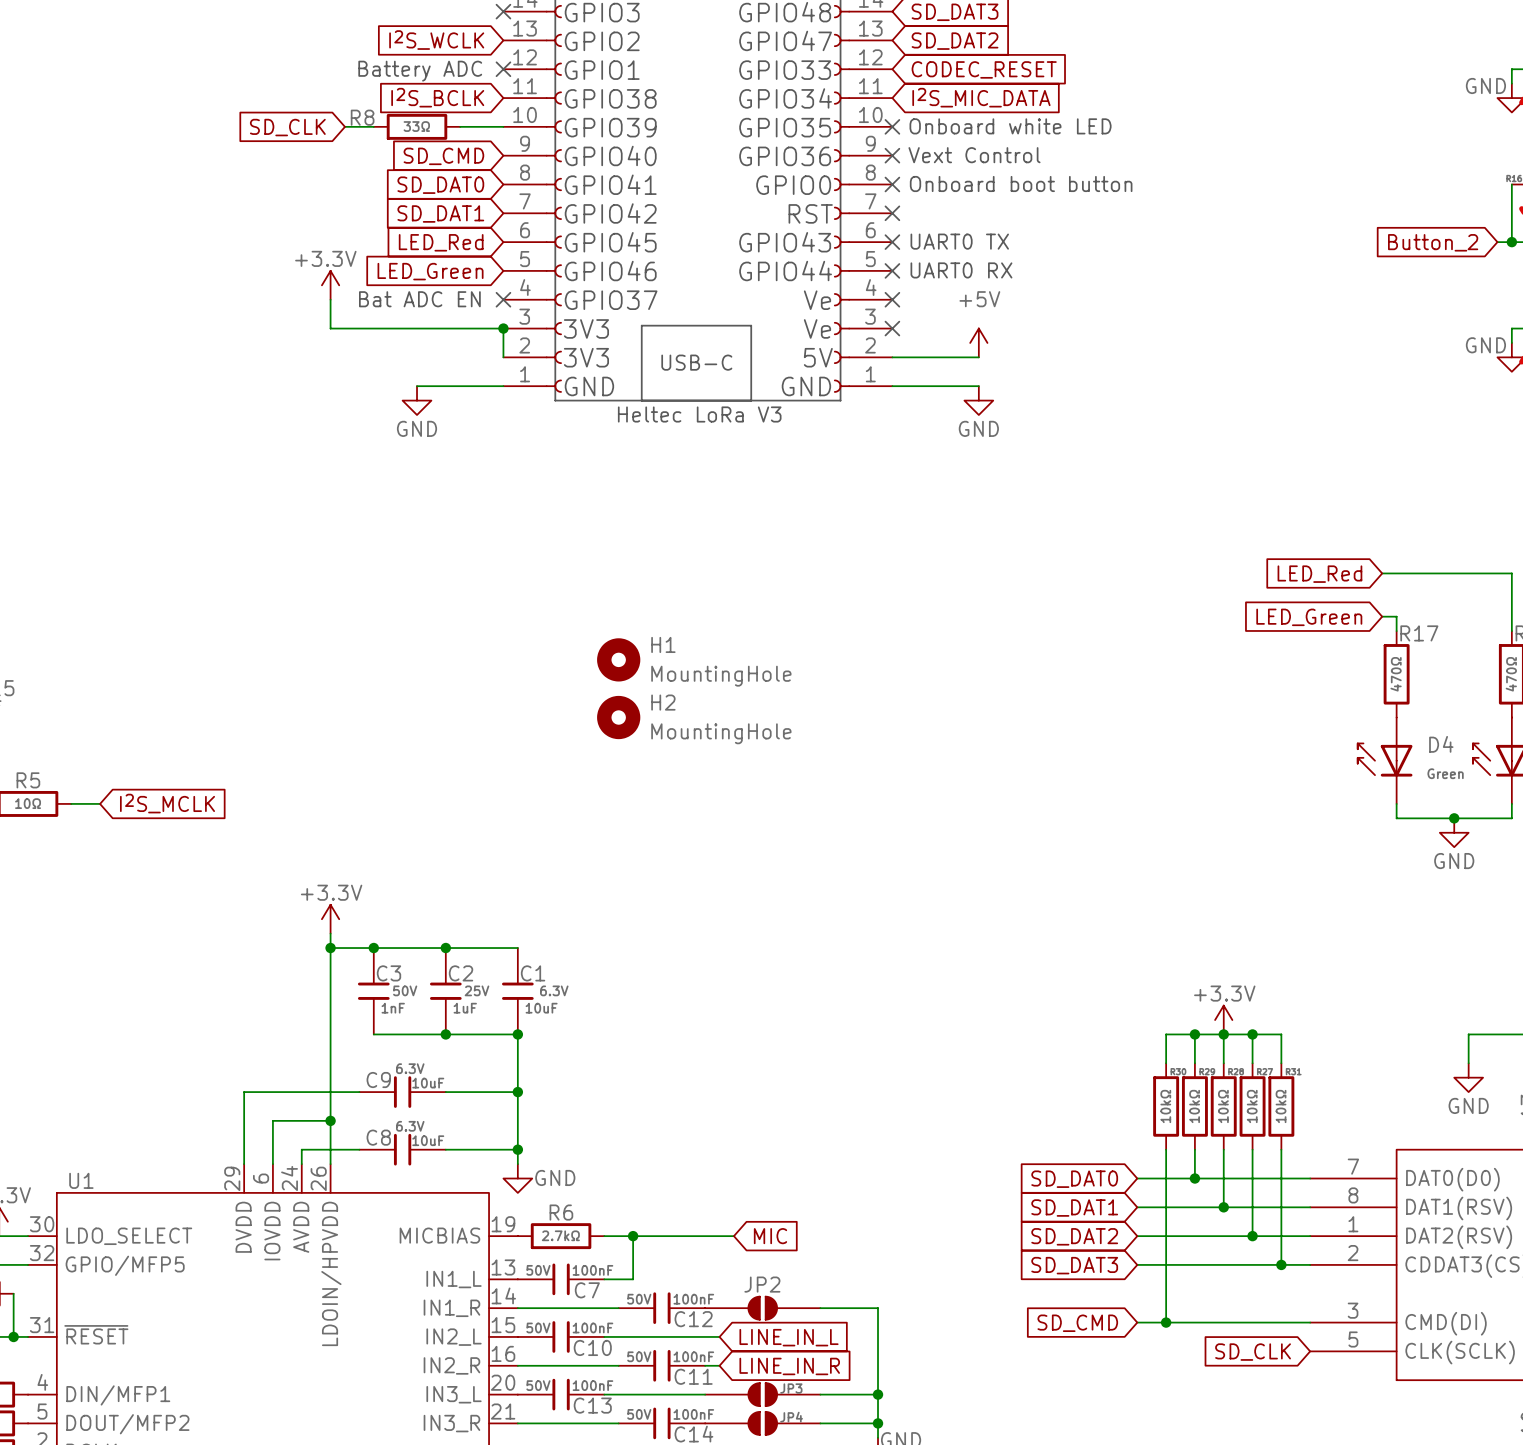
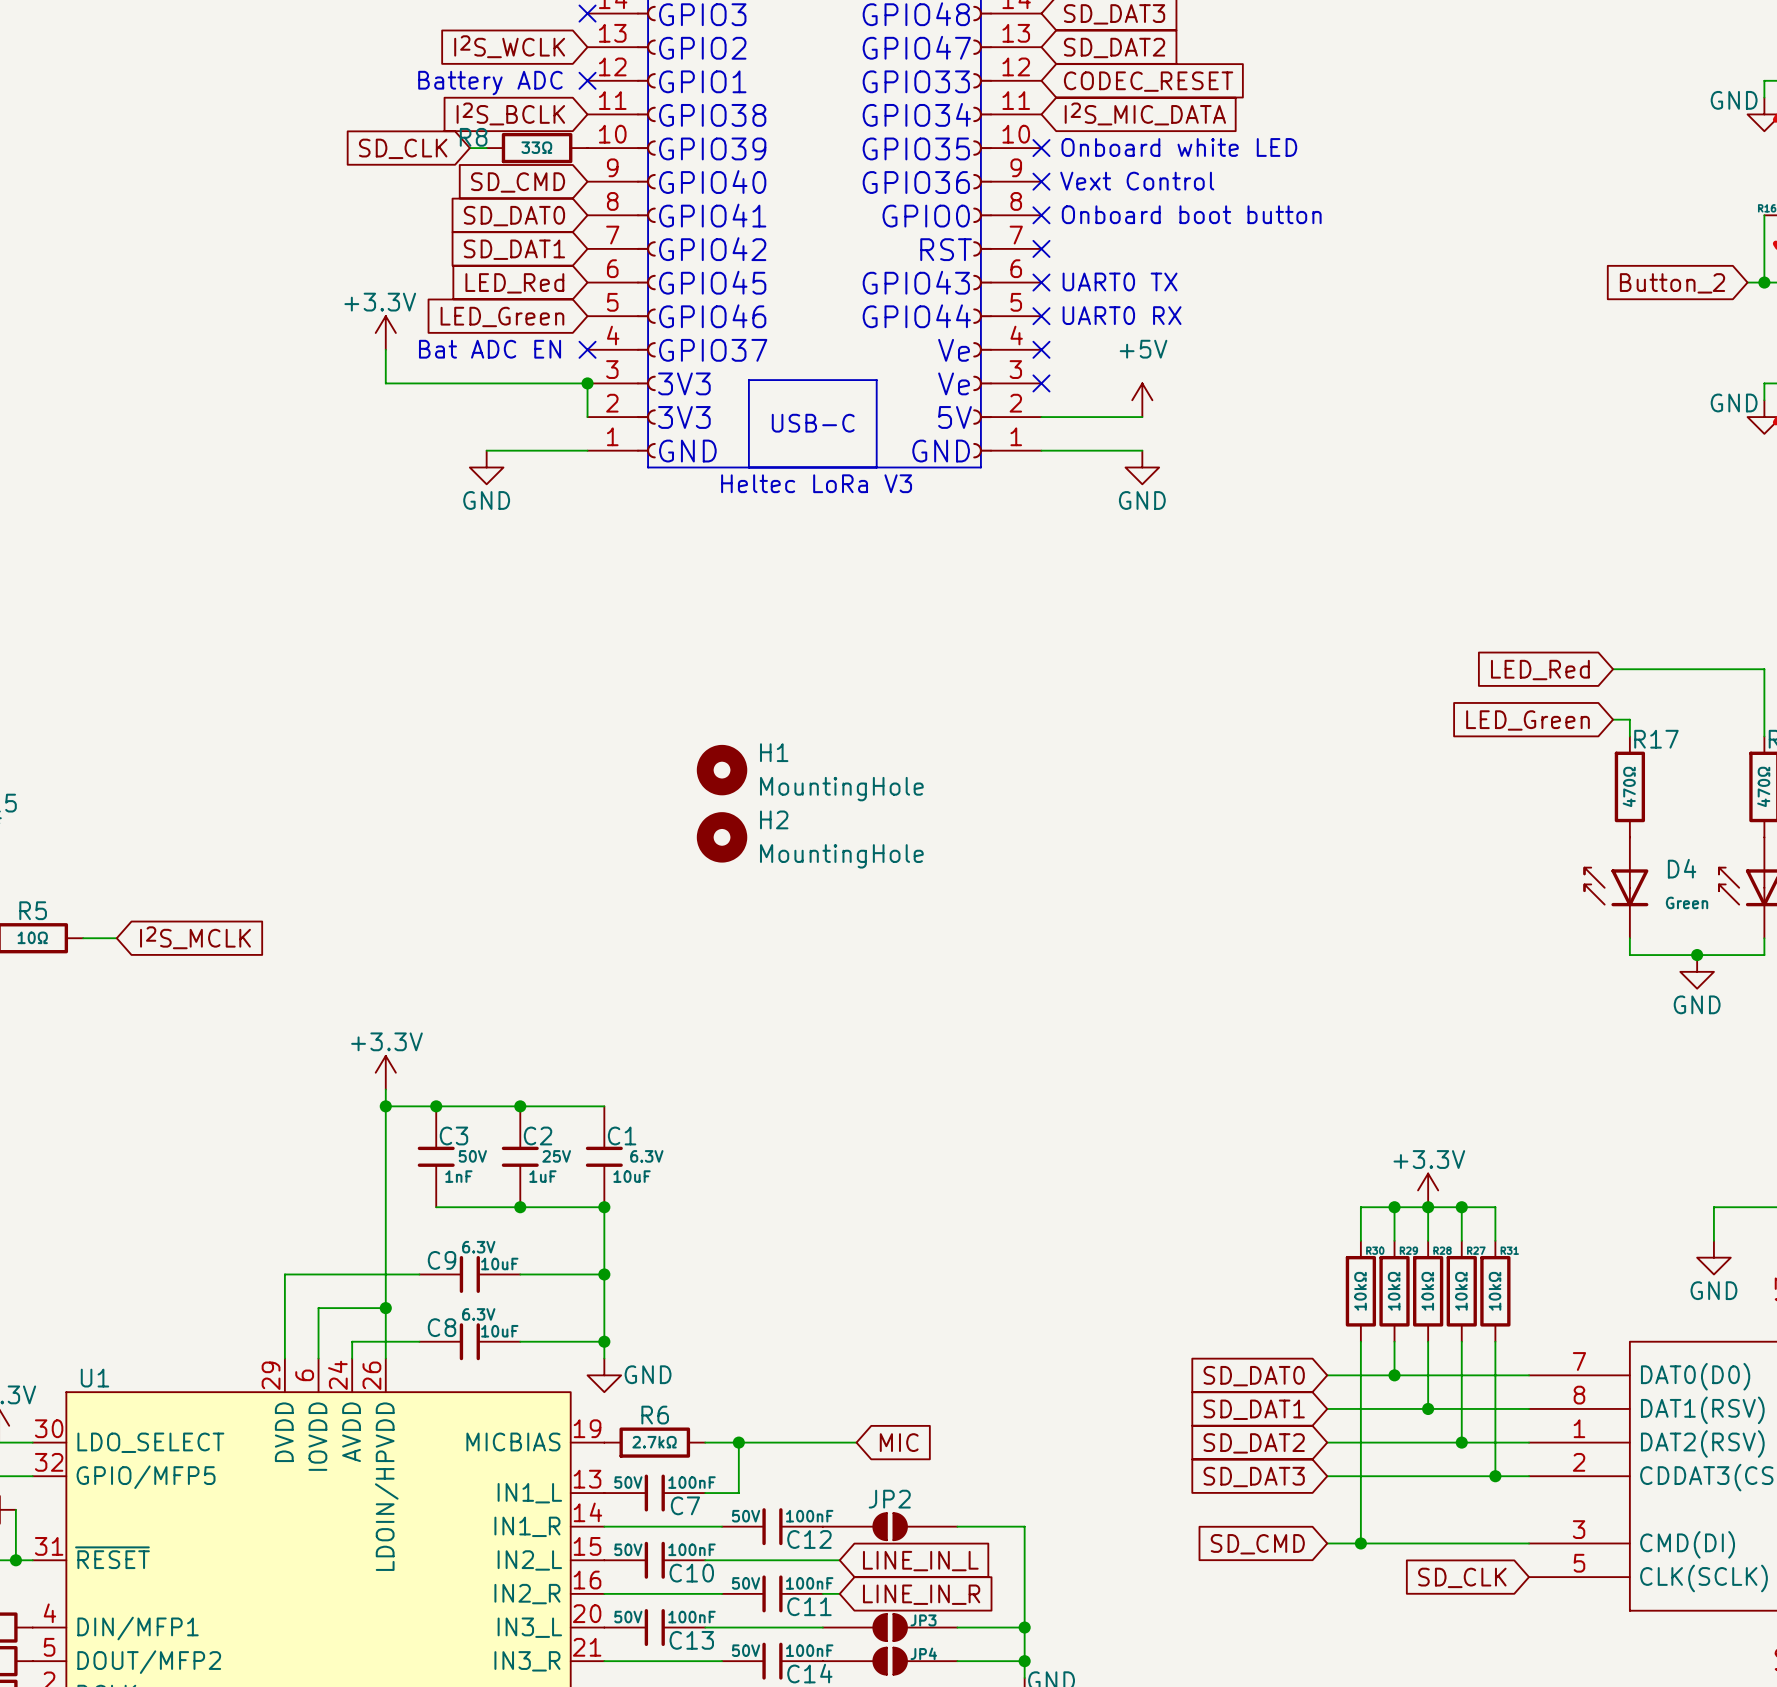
wire: (344, 126) (373, 126) -> none
wire: none -> (469, 148) (486, 148)
R8 position: (417, 126) -> (537, 148)
wire: (460, 126) (503, 126) -> none
global label position: SD_CLK (287, 127) -> SD_CLK (403, 148)

